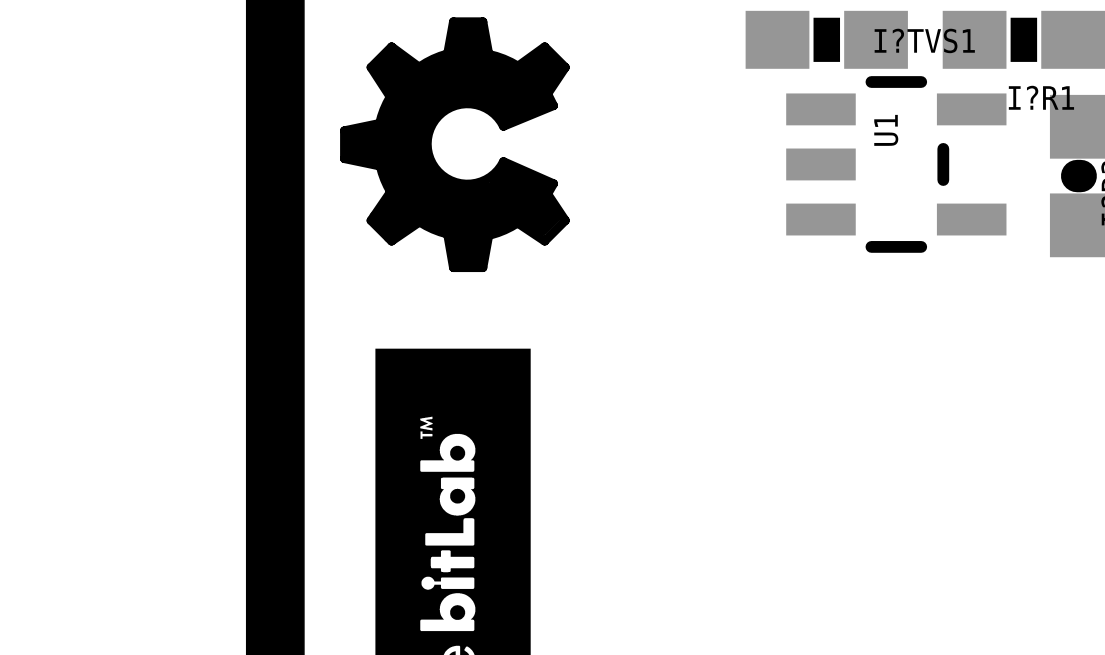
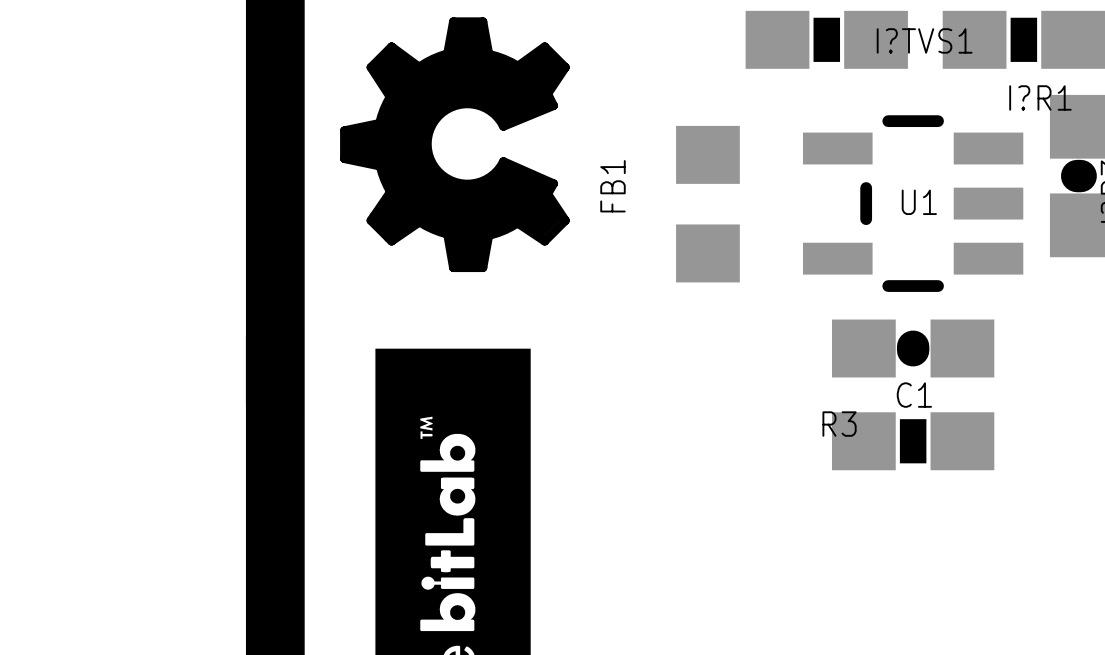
U1 rotation: 0° (896, 164) -> 180° (913, 203)
FB1: none -> (707, 204)
C1: none -> (913, 348)
R3: none -> (913, 441)

